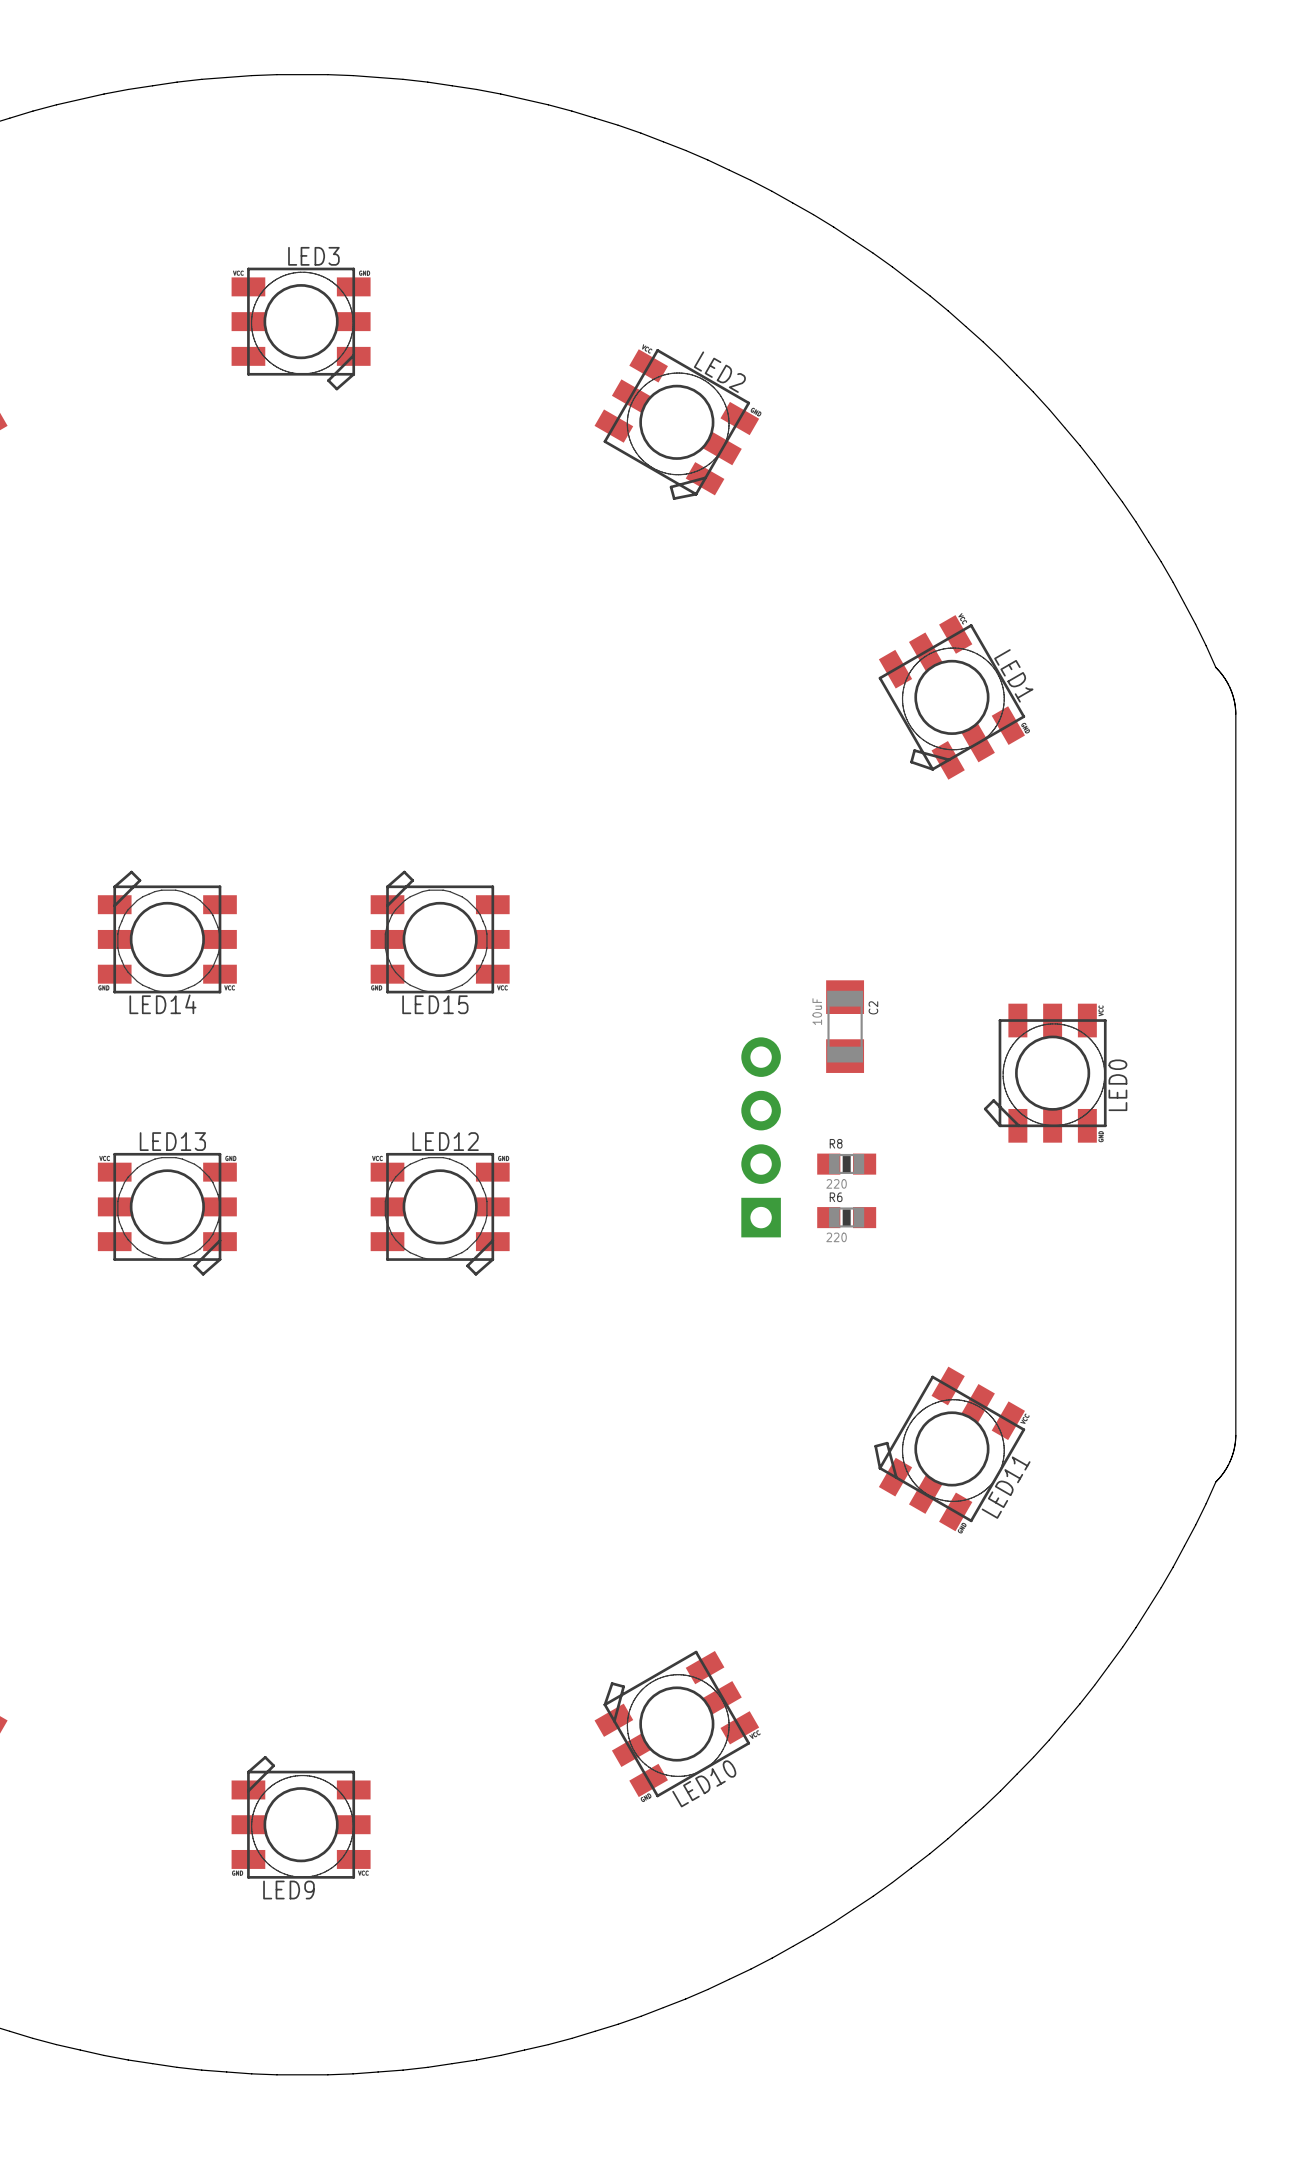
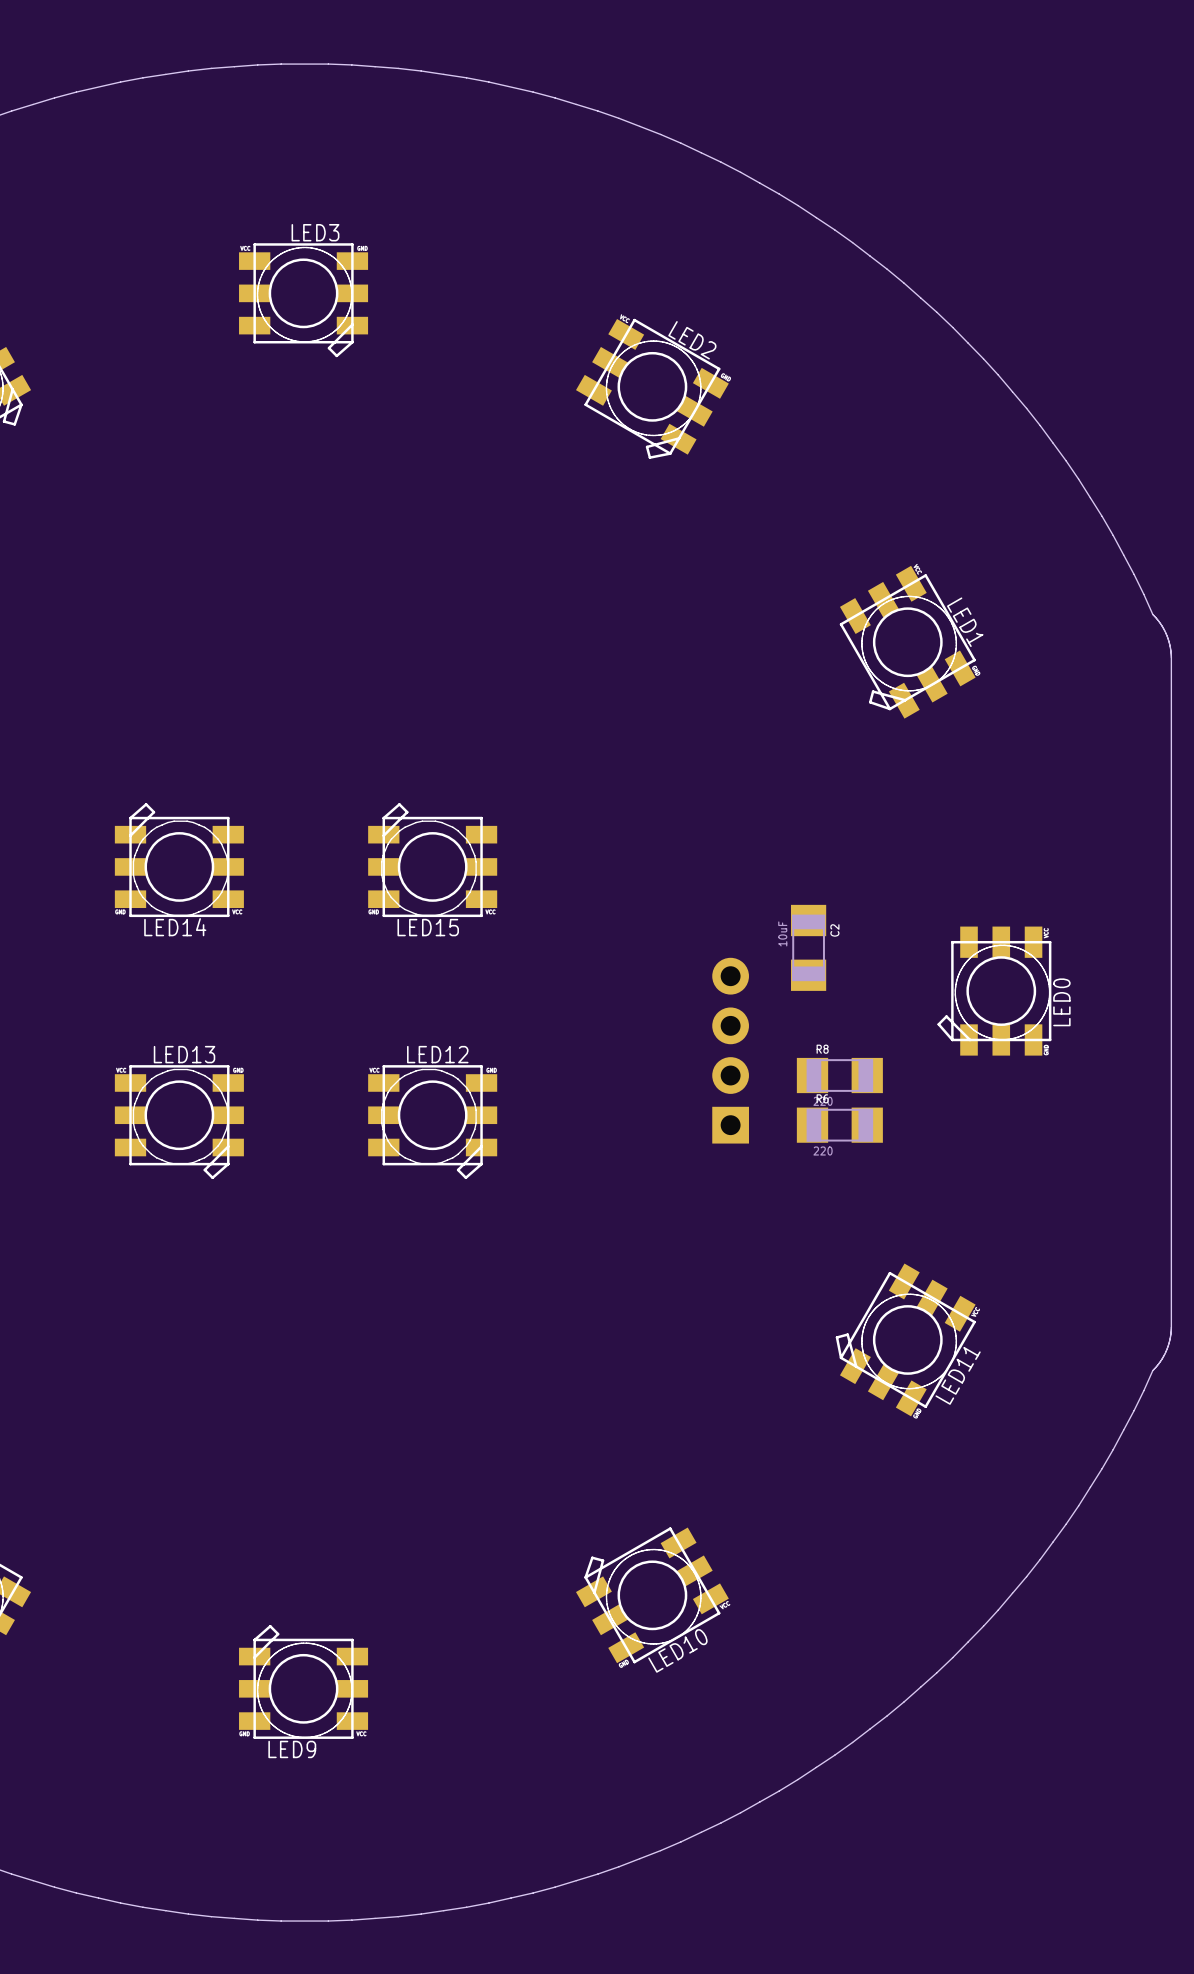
R8 footprint: [817, 1153, 877, 1175] -> [796, 1057, 883, 1094]
R6 footprint: [817, 1207, 877, 1229] -> [796, 1107, 883, 1143]

